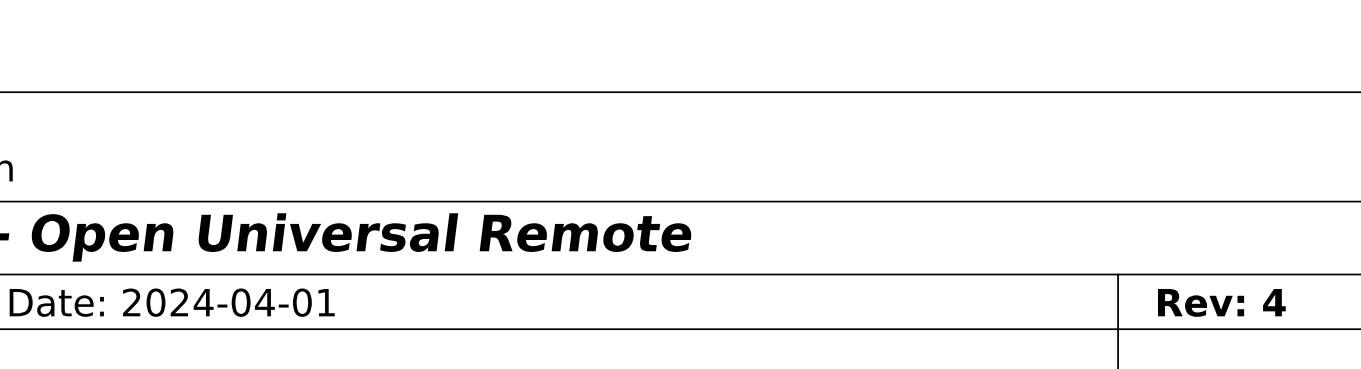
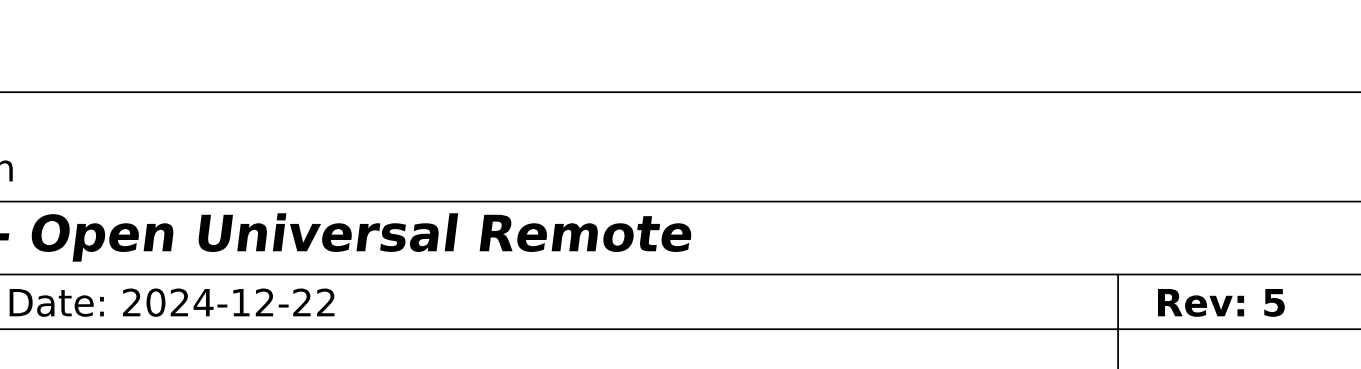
title block: Date: 2024-04-01 (172, 302) -> Date: 2024-12-22 (172, 302)
title block: Rev: 4 (1221, 302) -> Rev: 5 (1221, 302)

